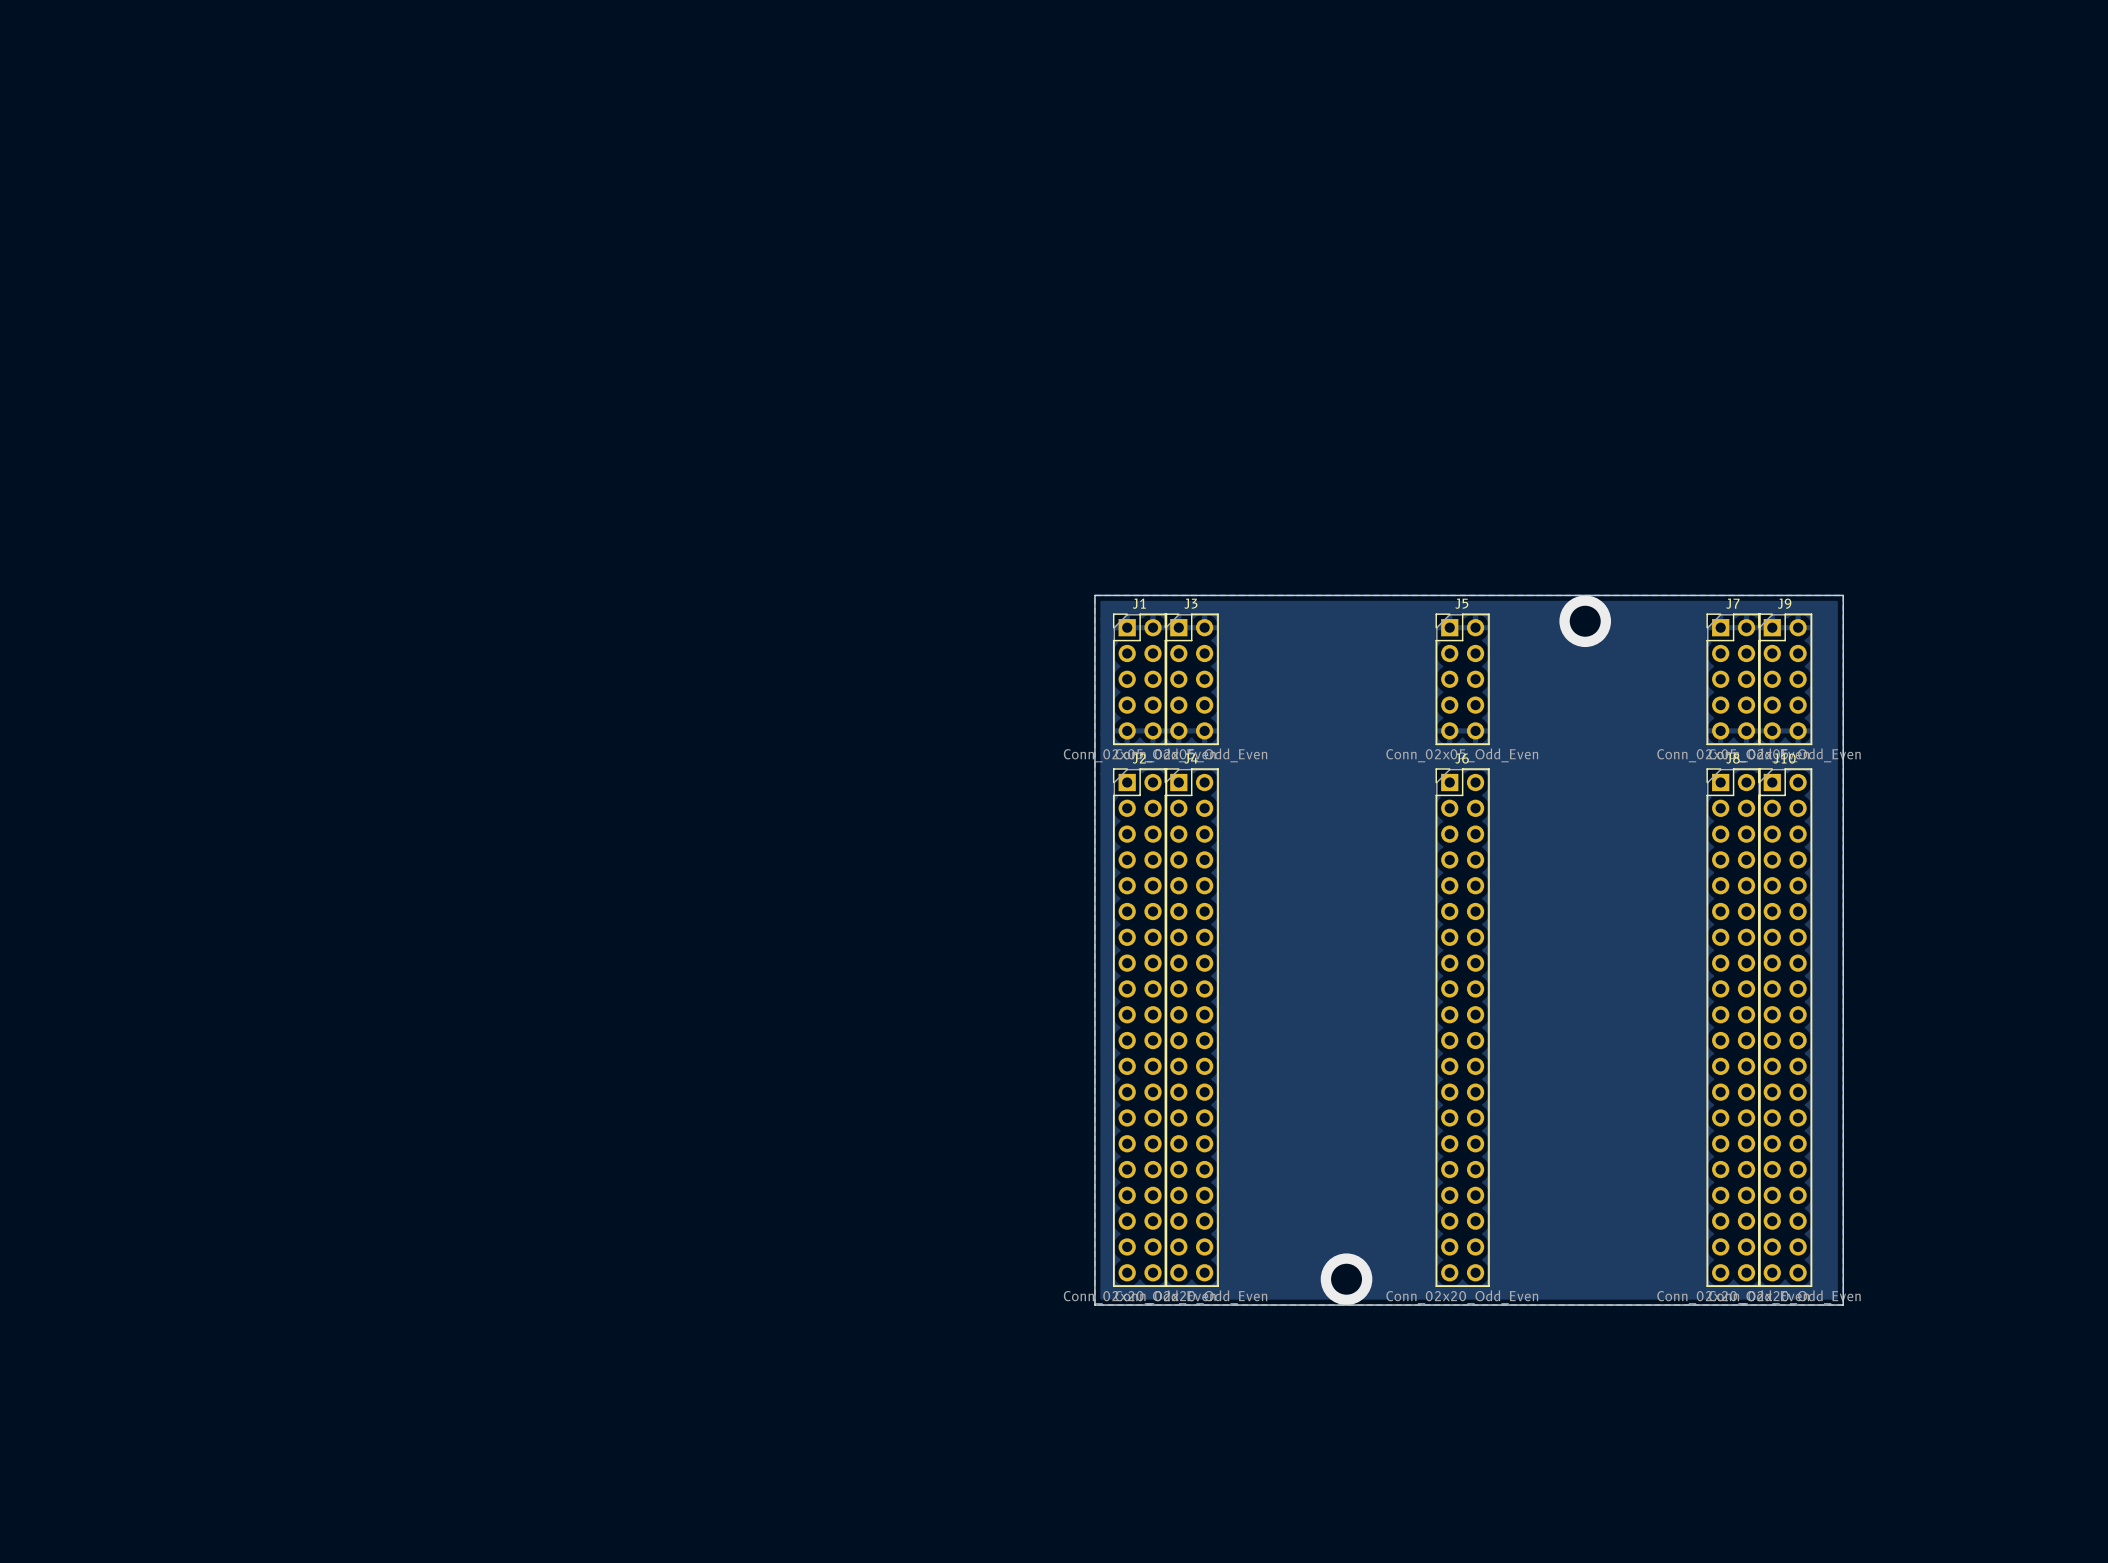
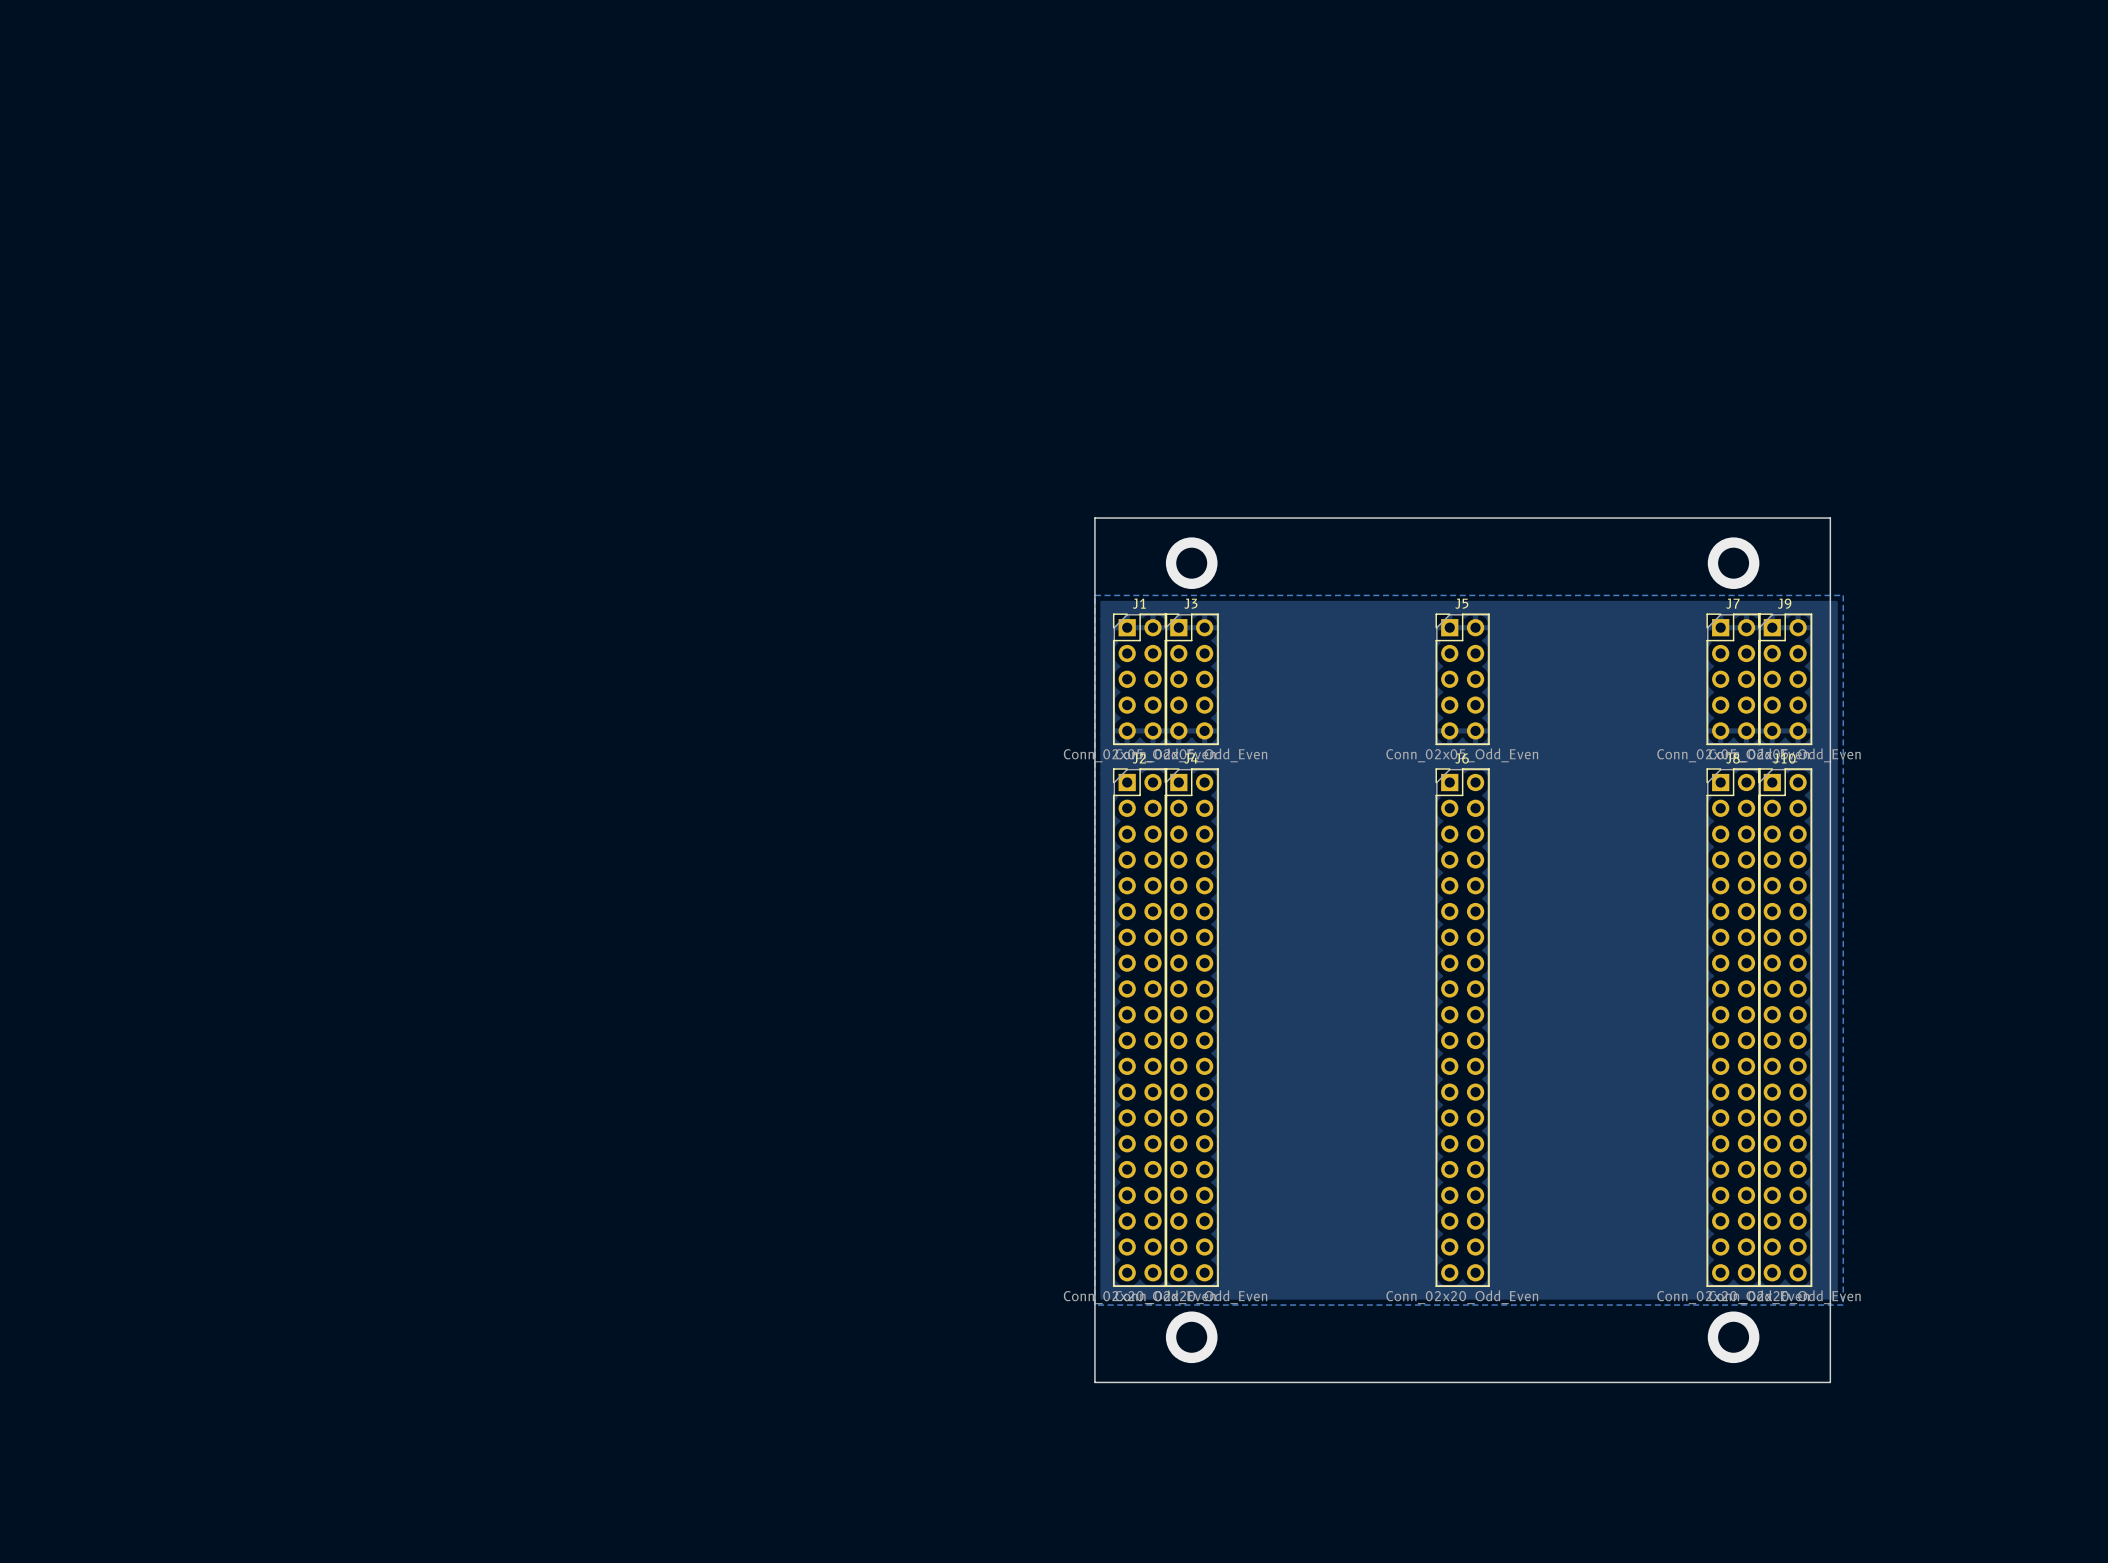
via: none -> (1191, 563)
via: none -> (1733, 563)
board edge: (1094, 595) (1843, 595) (1843, 1305) (1094, 1305) -> (1094, 595) (1094, 518) (1830, 518) (1830, 1382) (1094, 1382) (1094, 1305)
via: (1585, 621) -> none
via: (1346, 1279) -> none
via: none -> (1191, 1337)
via: none -> (1733, 1337)

